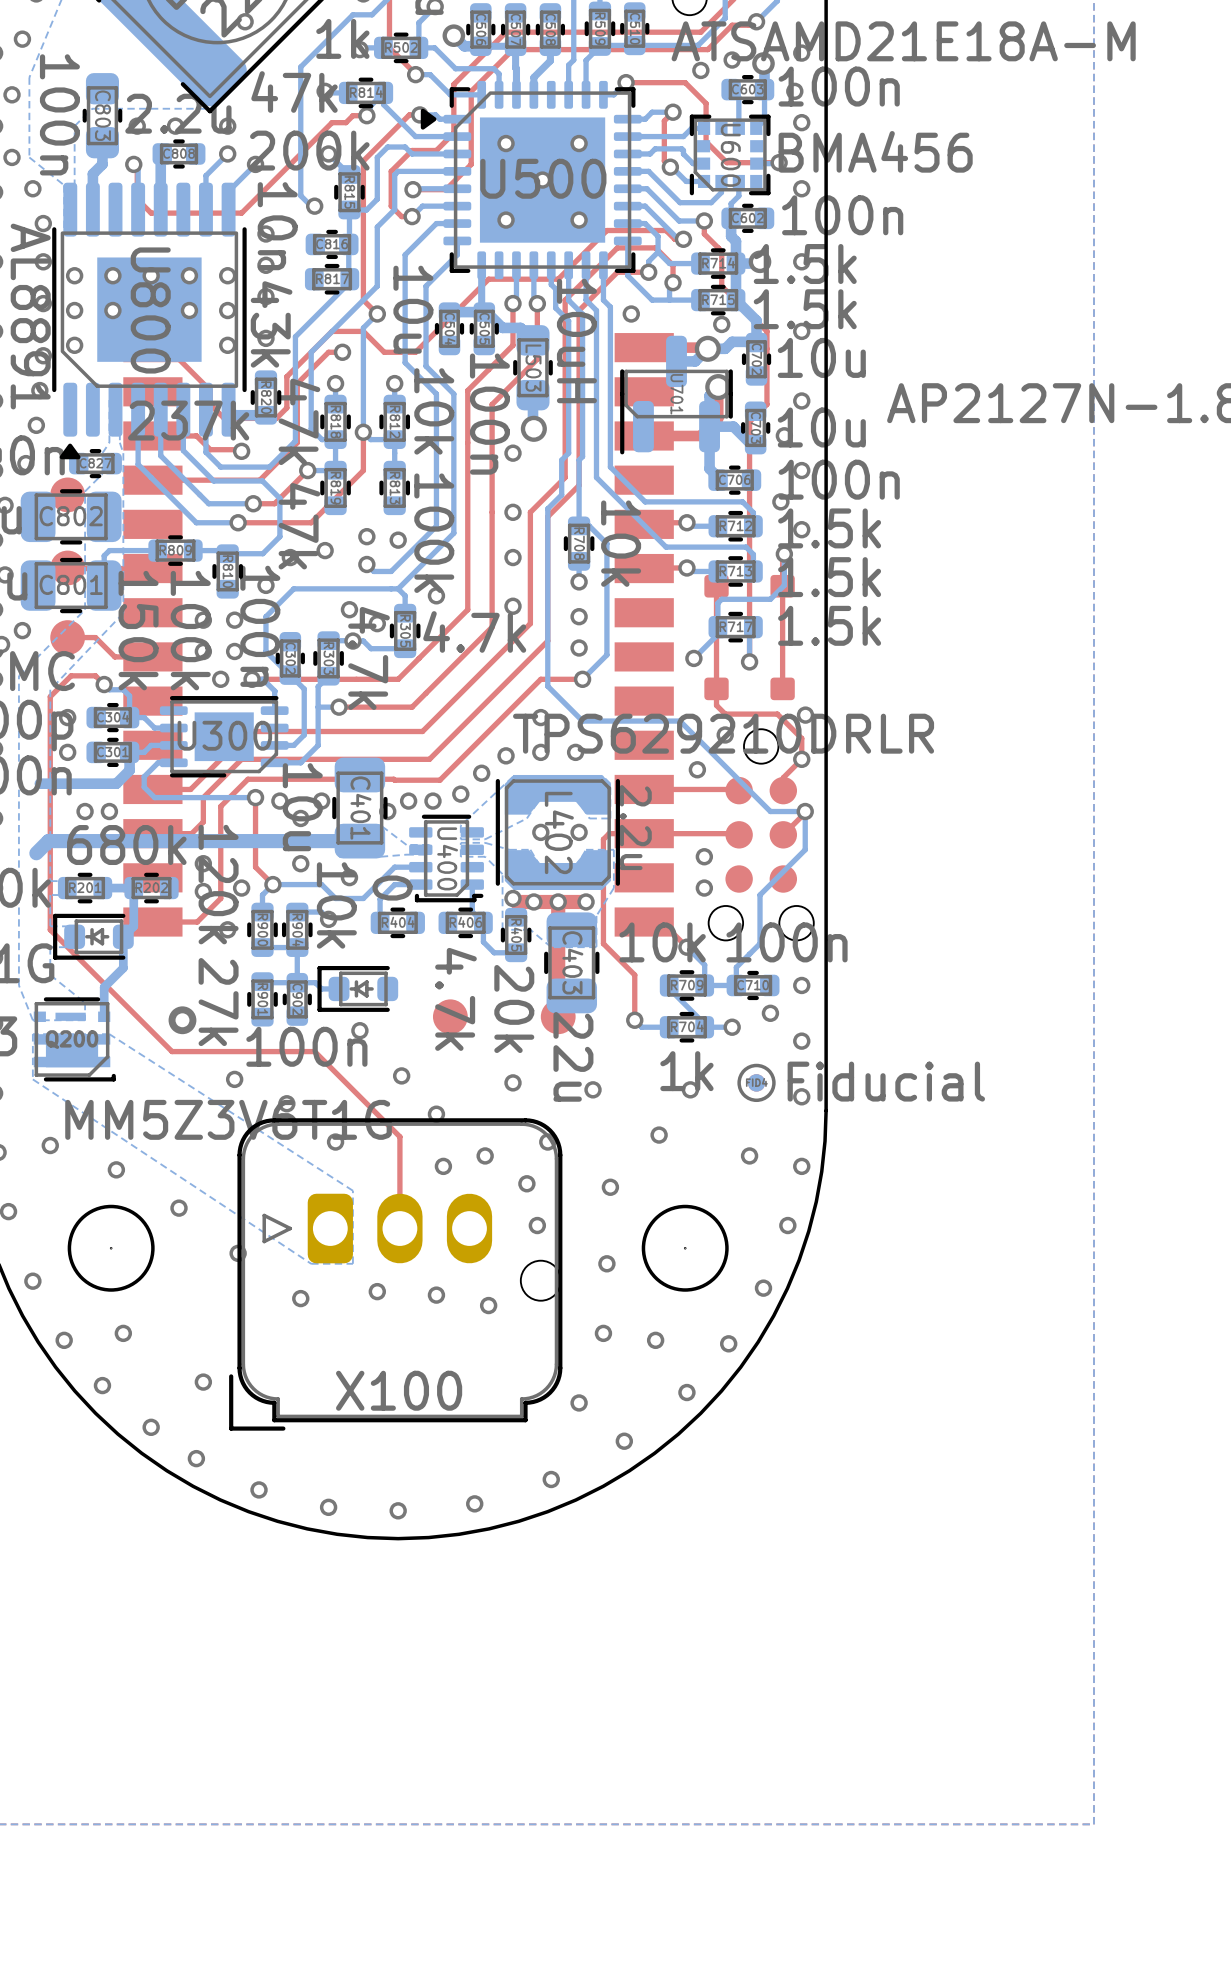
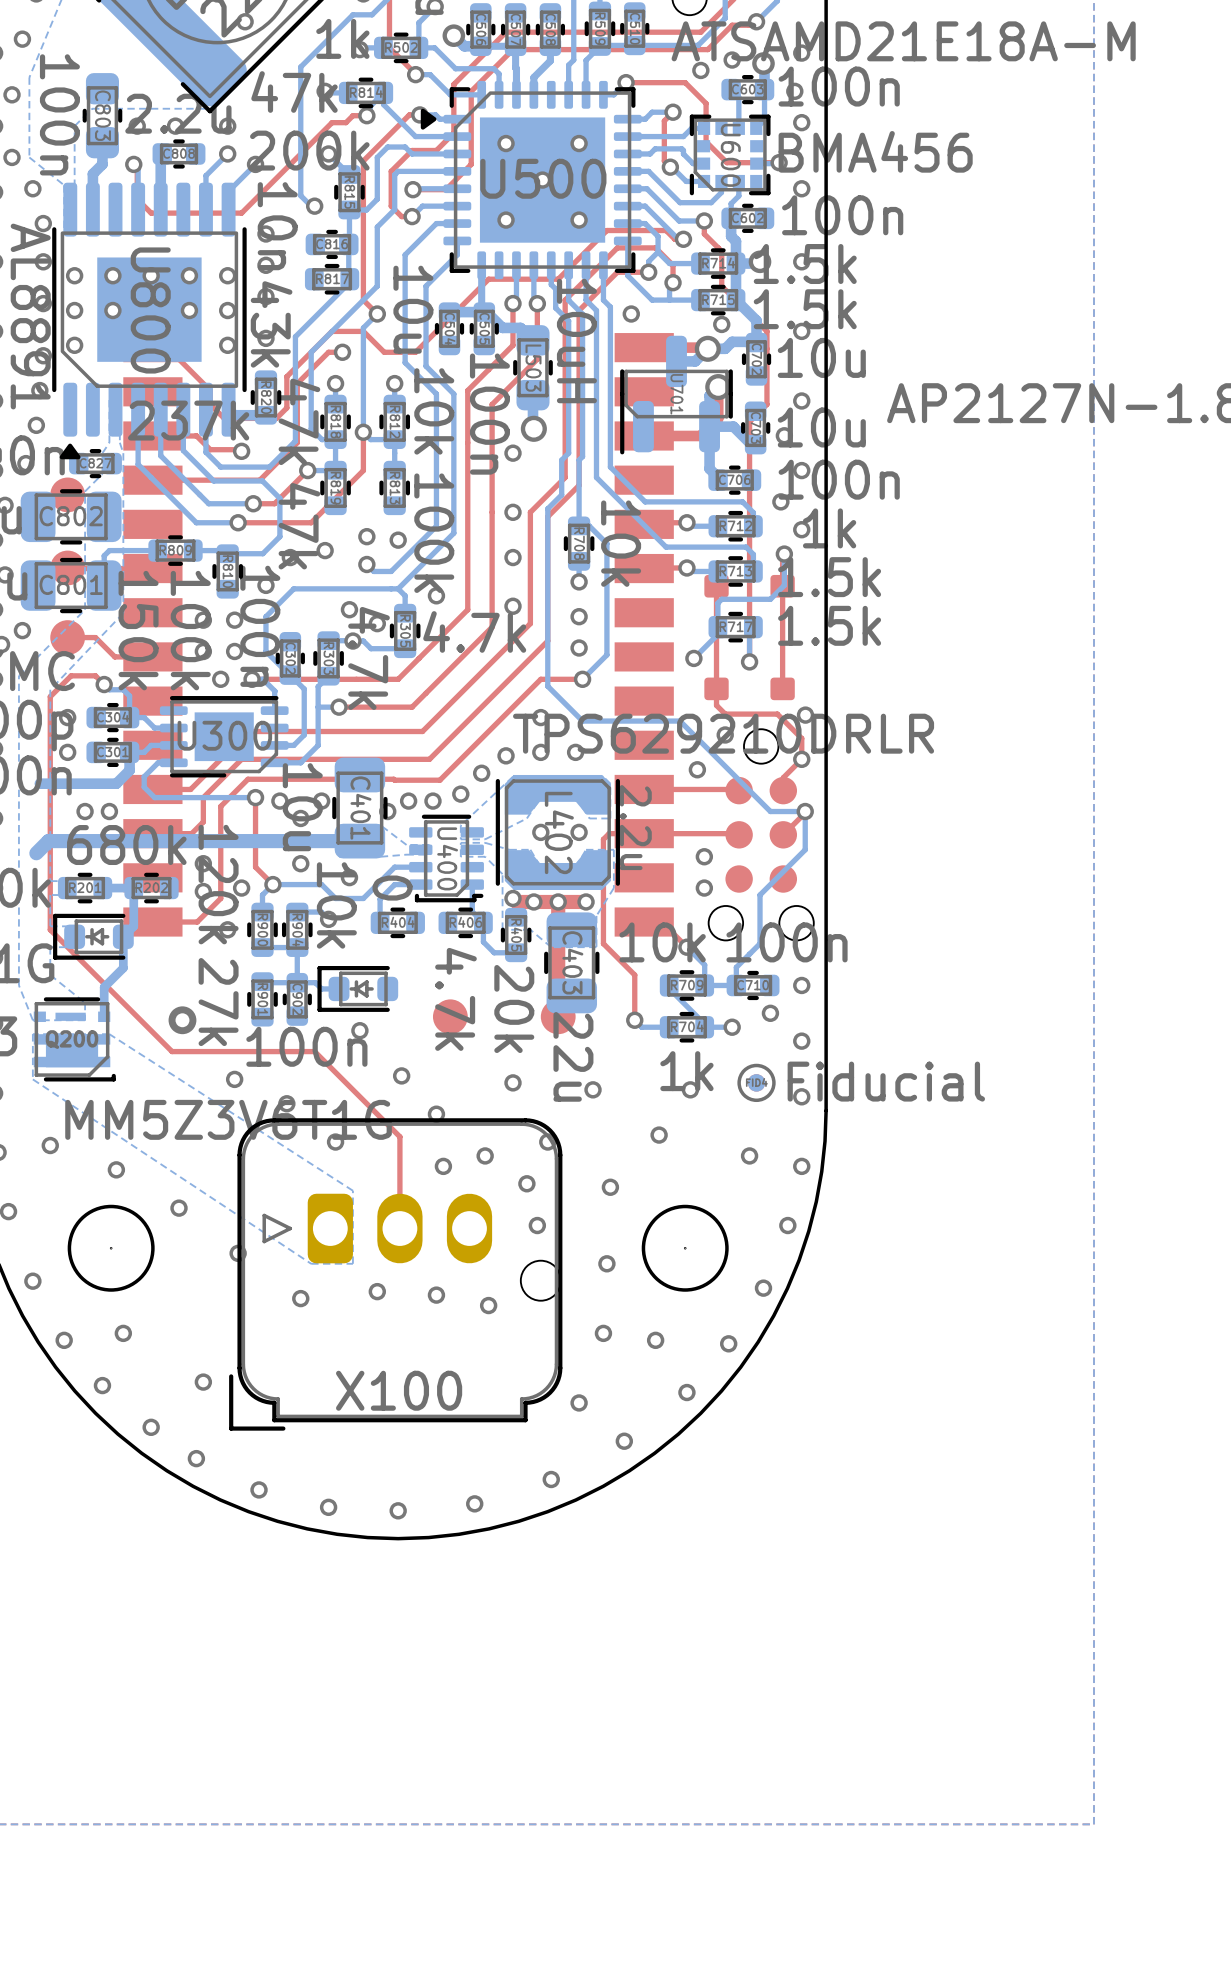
R712 value: 1.5k (829, 528) -> 1k (829, 528)

